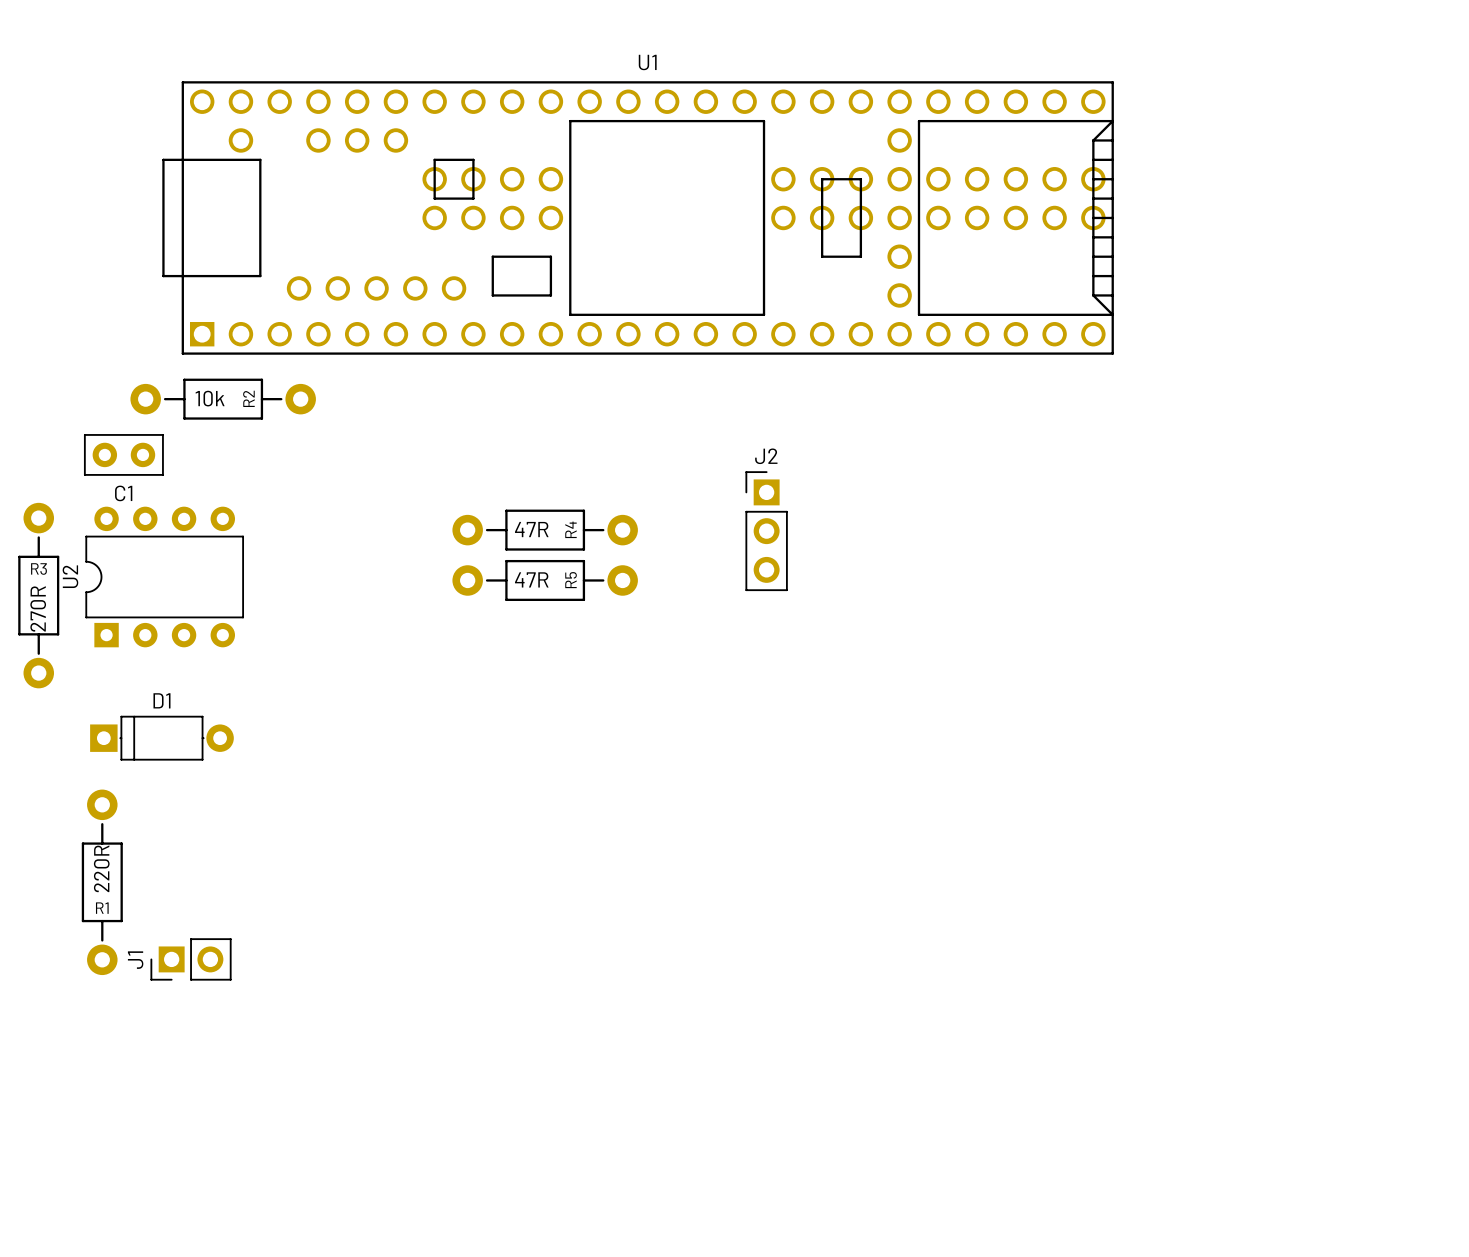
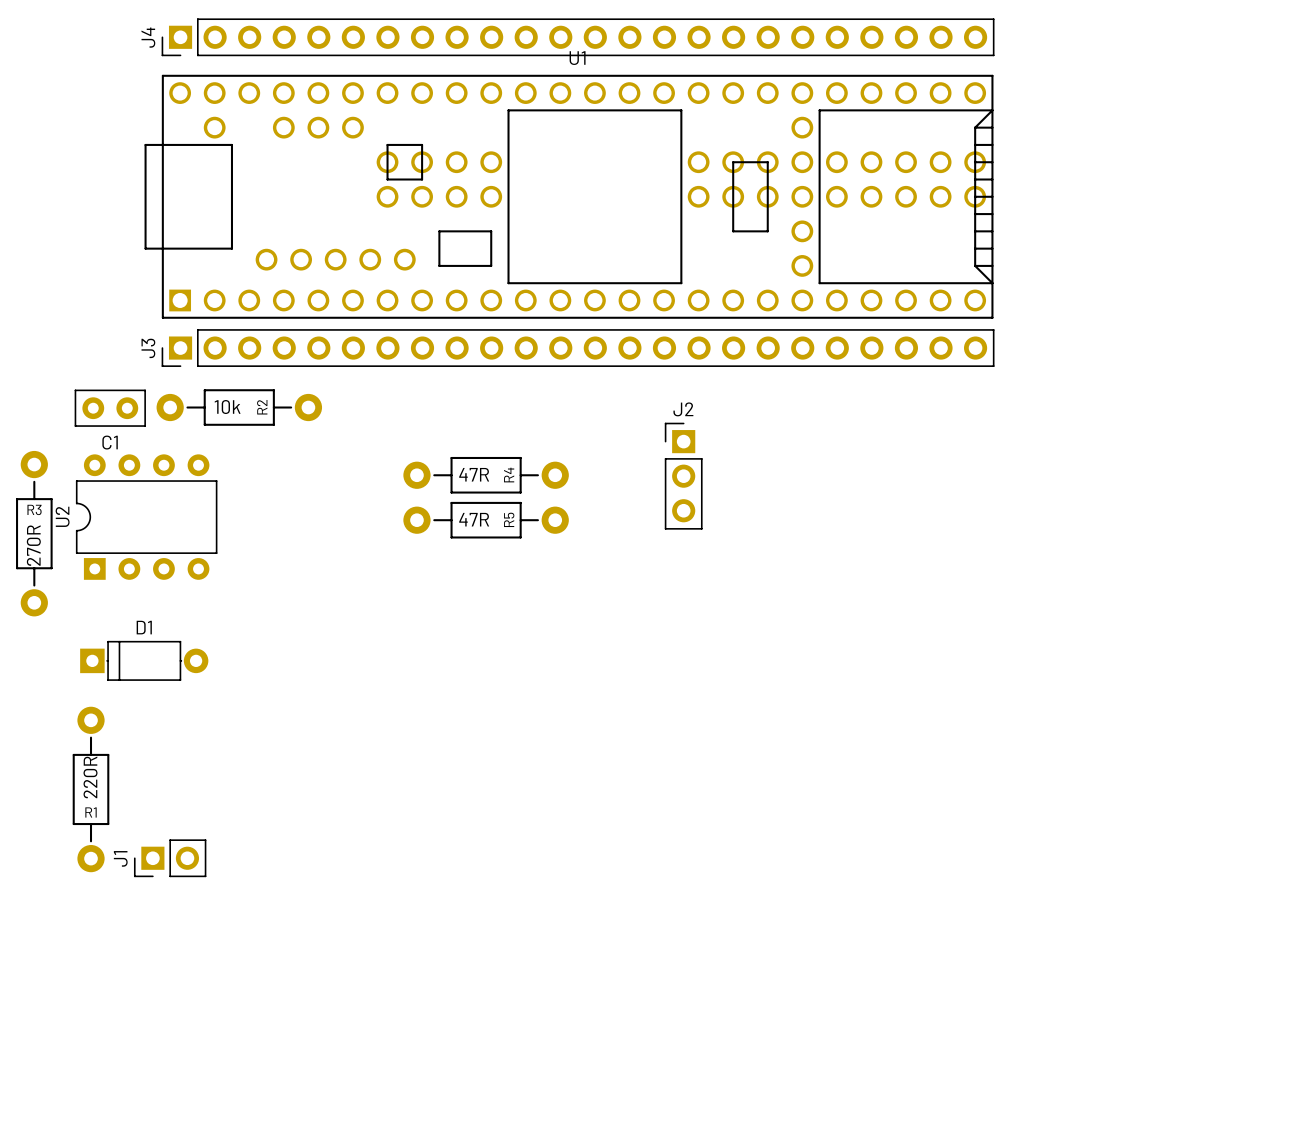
J4: none -> (578, 37)
J3: none -> (578, 348)
R2 position: (223, 399) -> (239, 407)

